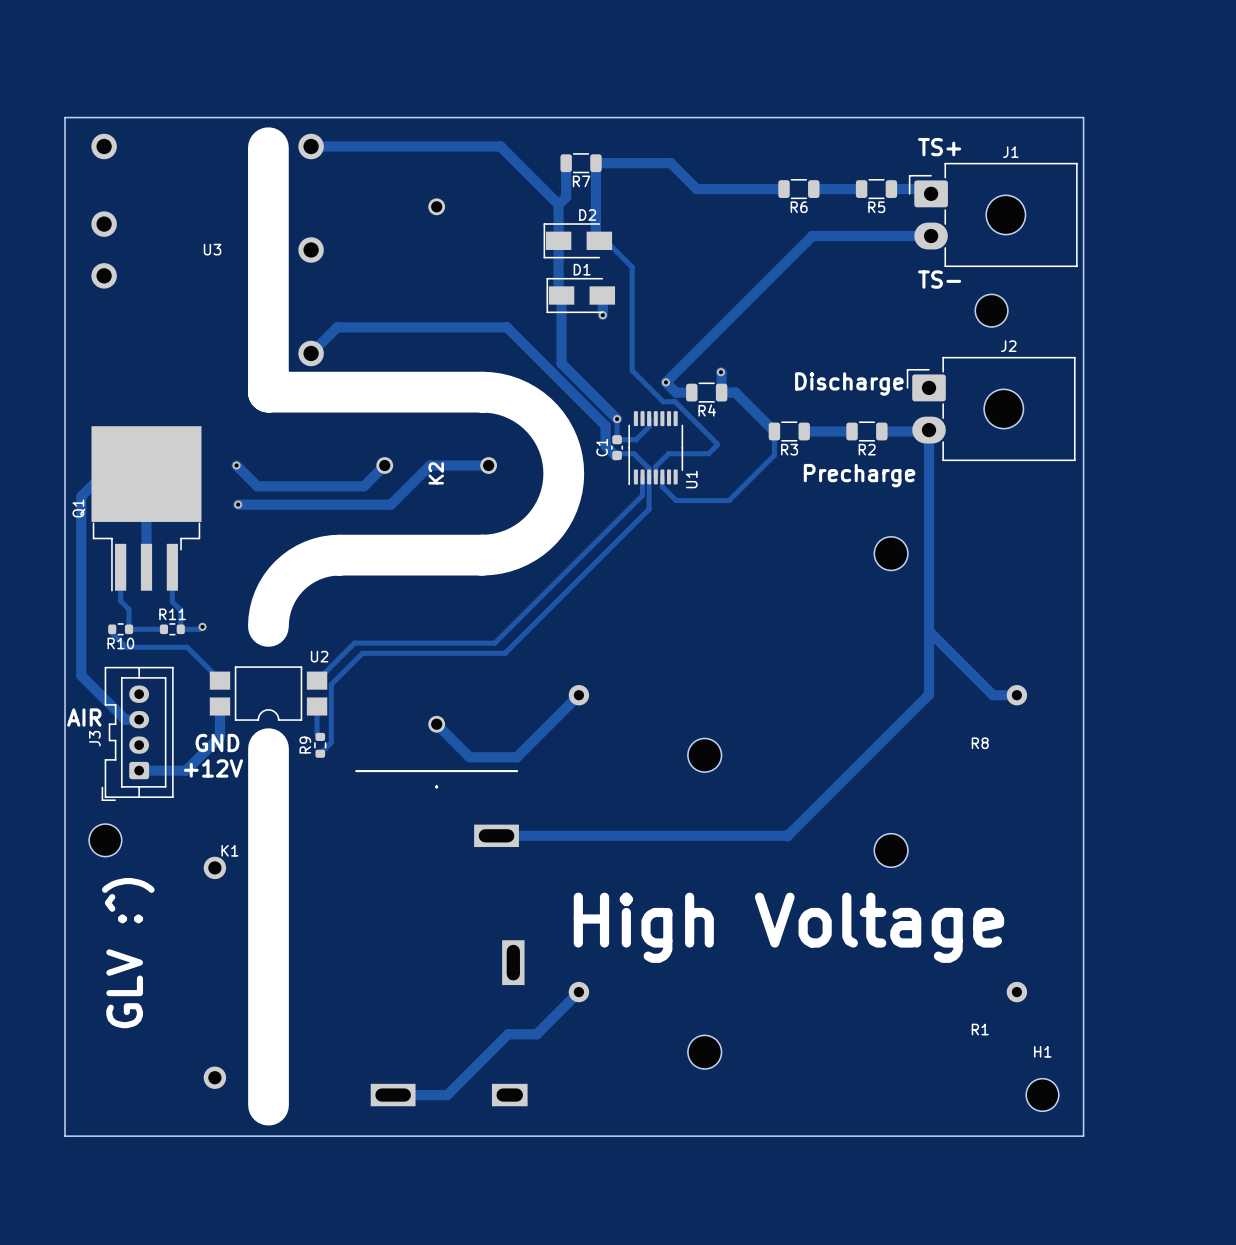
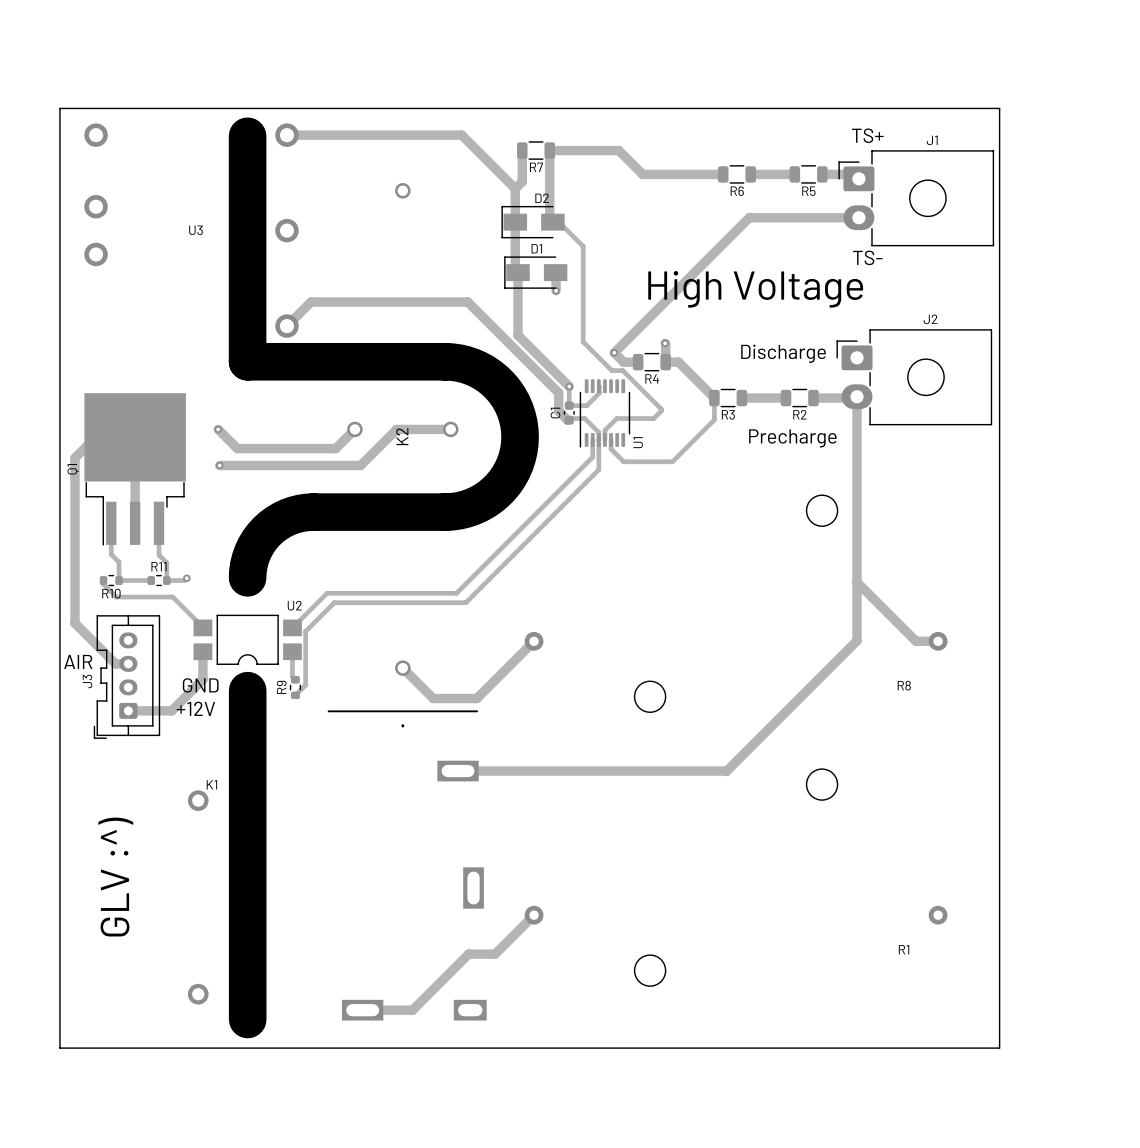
part: (991, 310) -> none
text: none -> High Voltage (755, 289)
part: (105, 840) -> none
text: High Voltage (788, 927) -> none
H1: (1042, 1094) -> none

